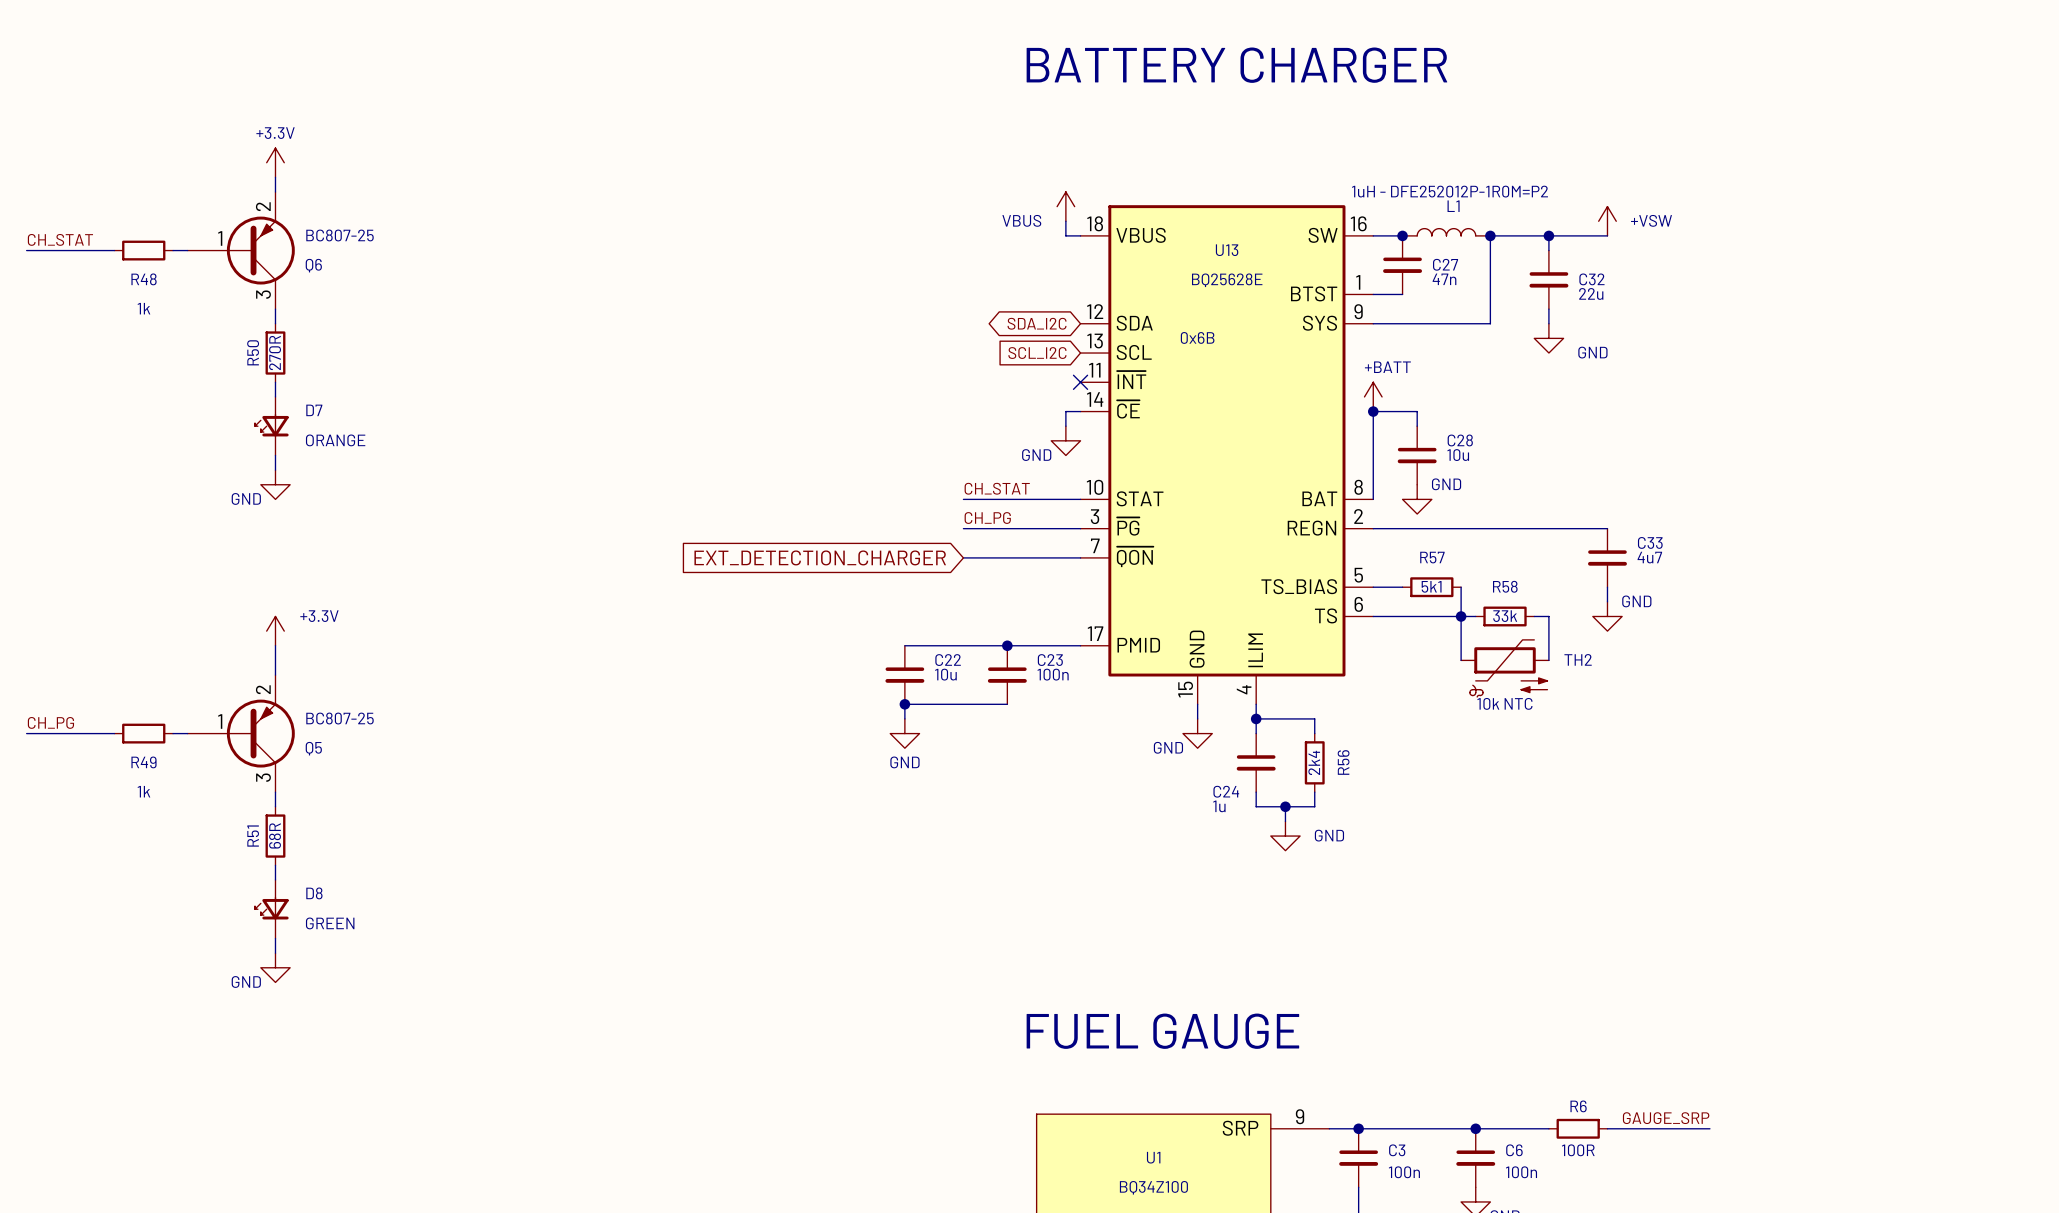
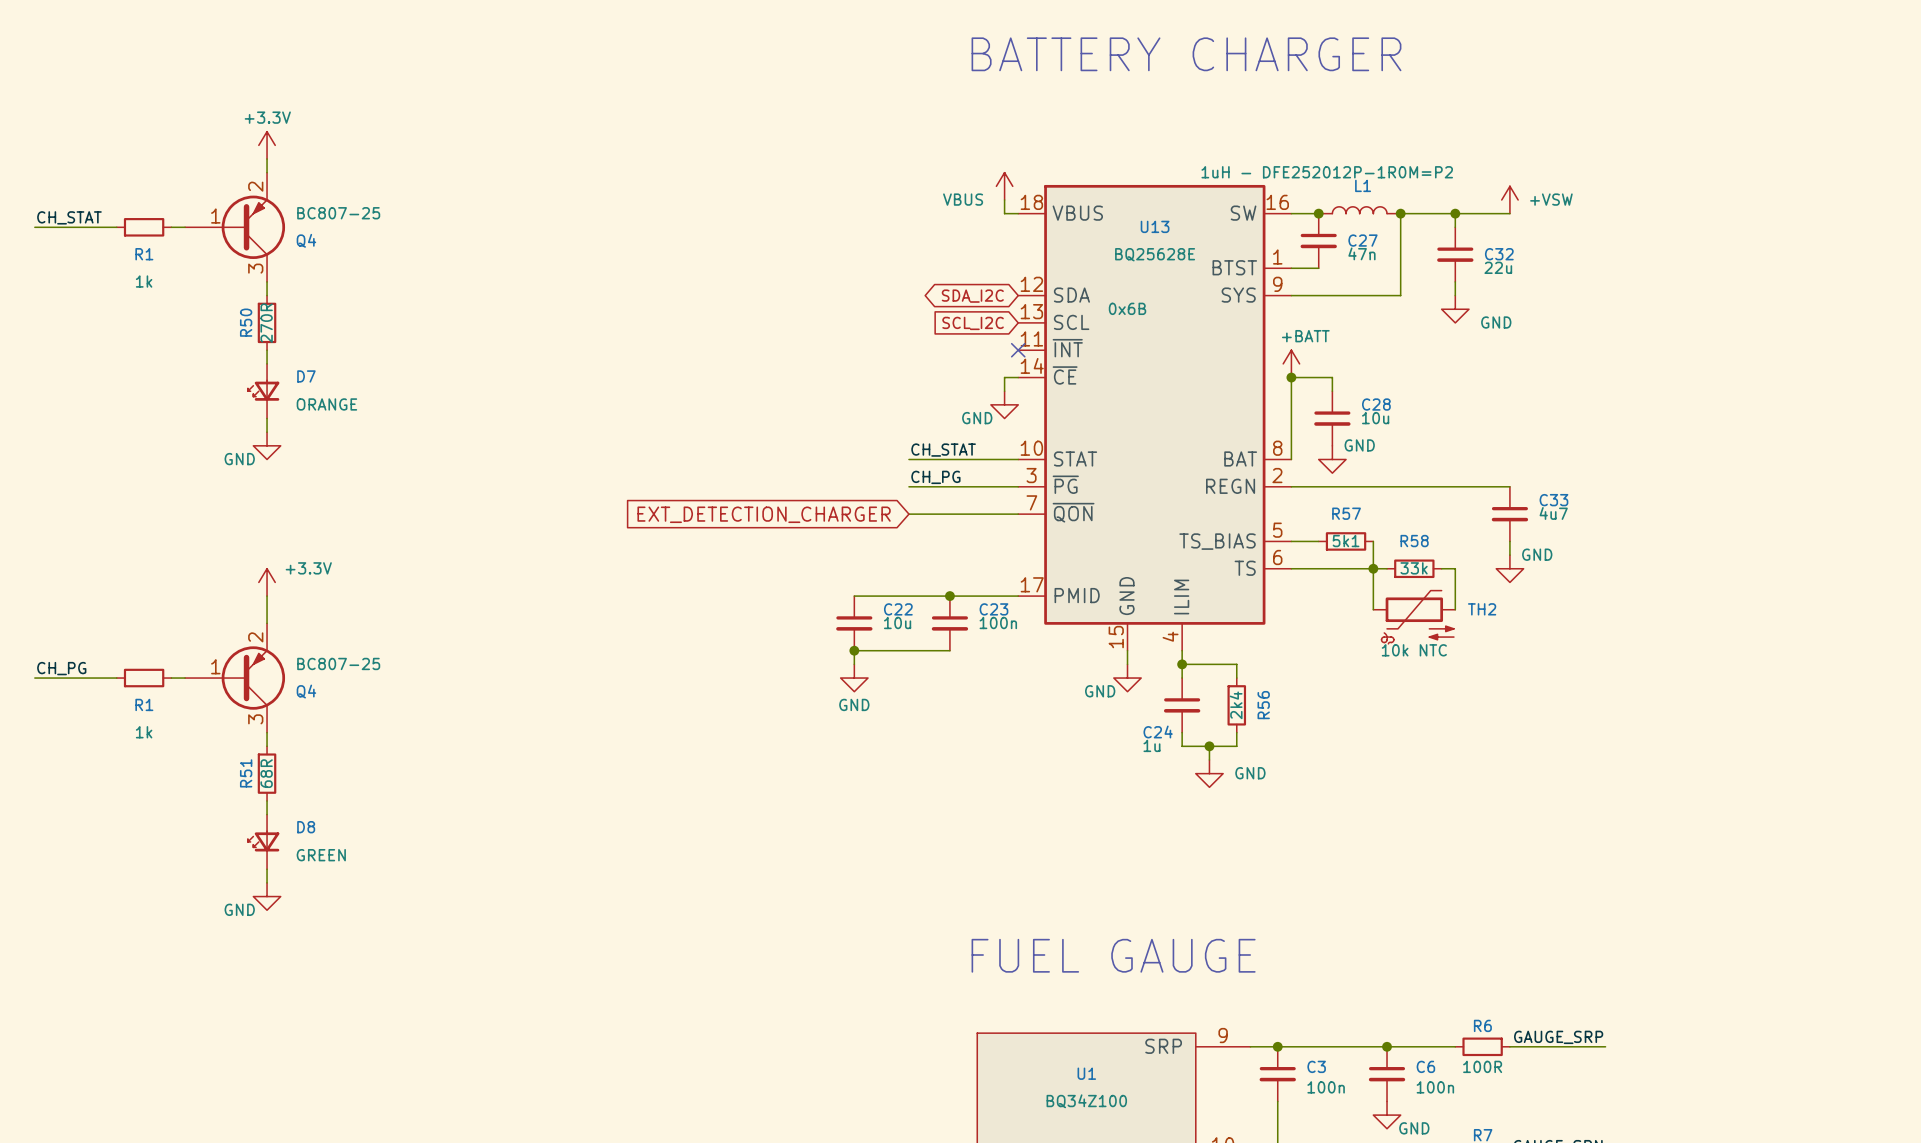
Q6 name: Q6 (313, 265) -> Q4 (306, 240)
R48 name: R48 (144, 279) -> R1 (144, 254)
Q5 name: Q5 (313, 748) -> Q4 (306, 691)
R49 name: R49 (143, 762) -> R1 (144, 704)

